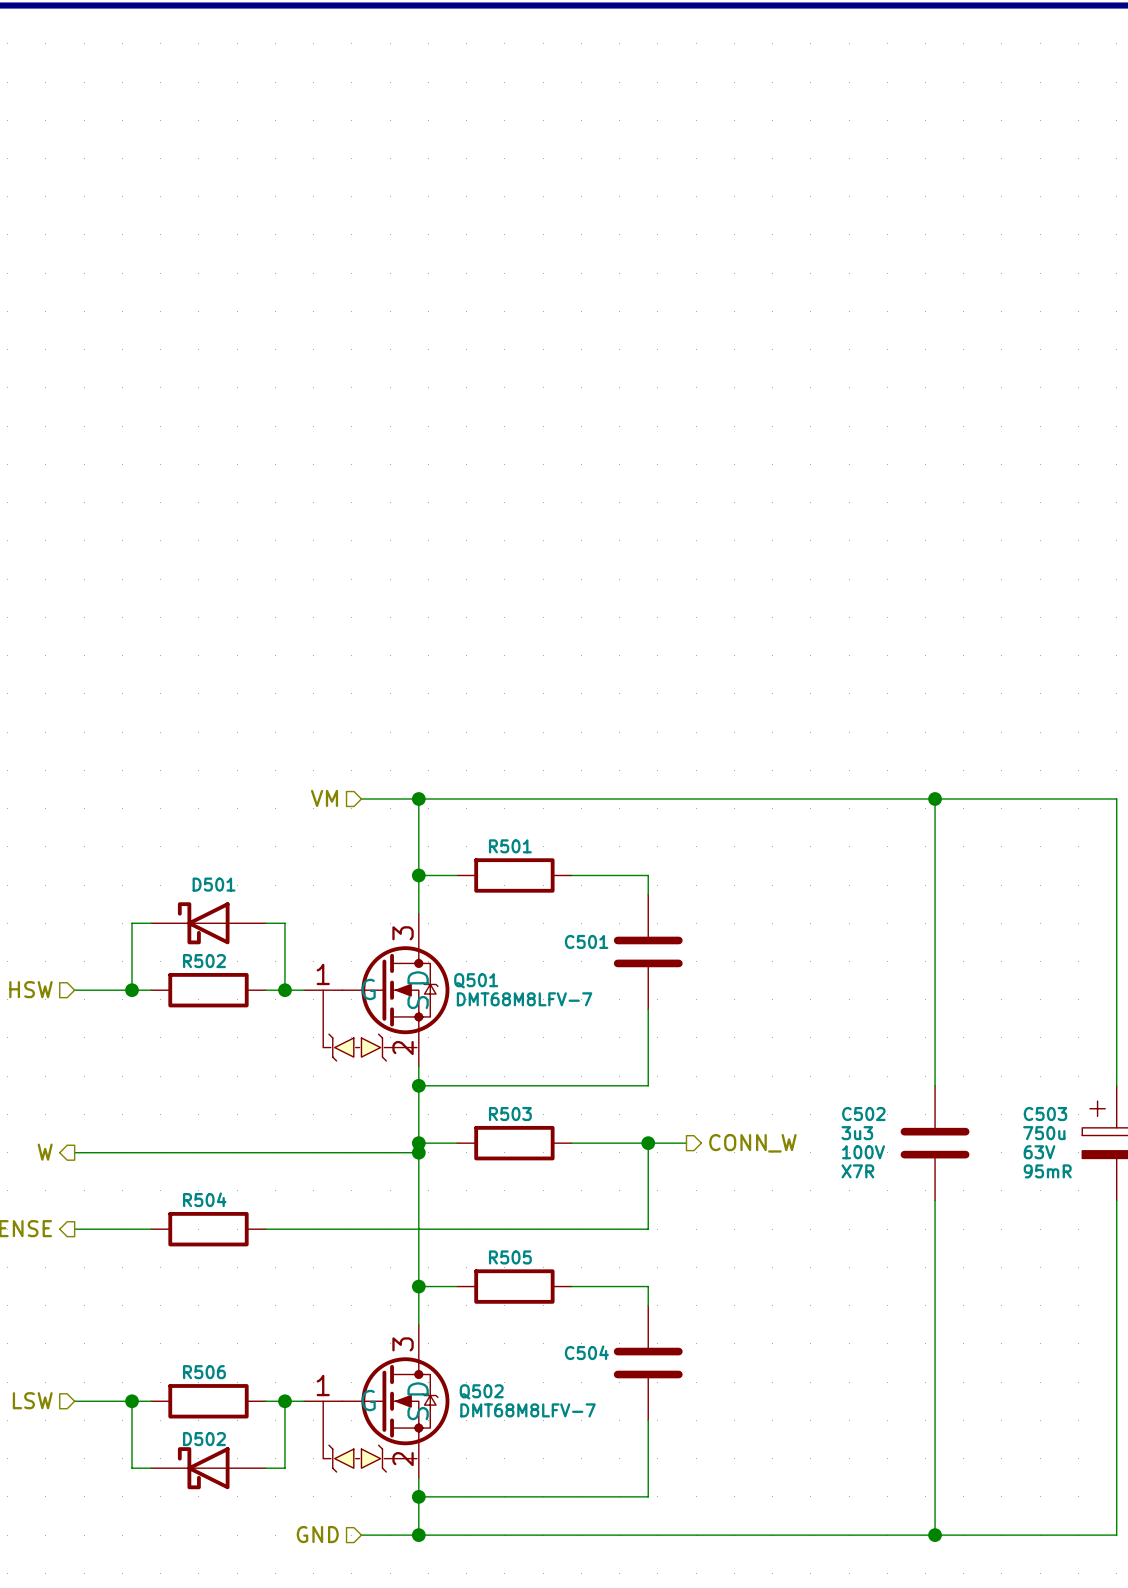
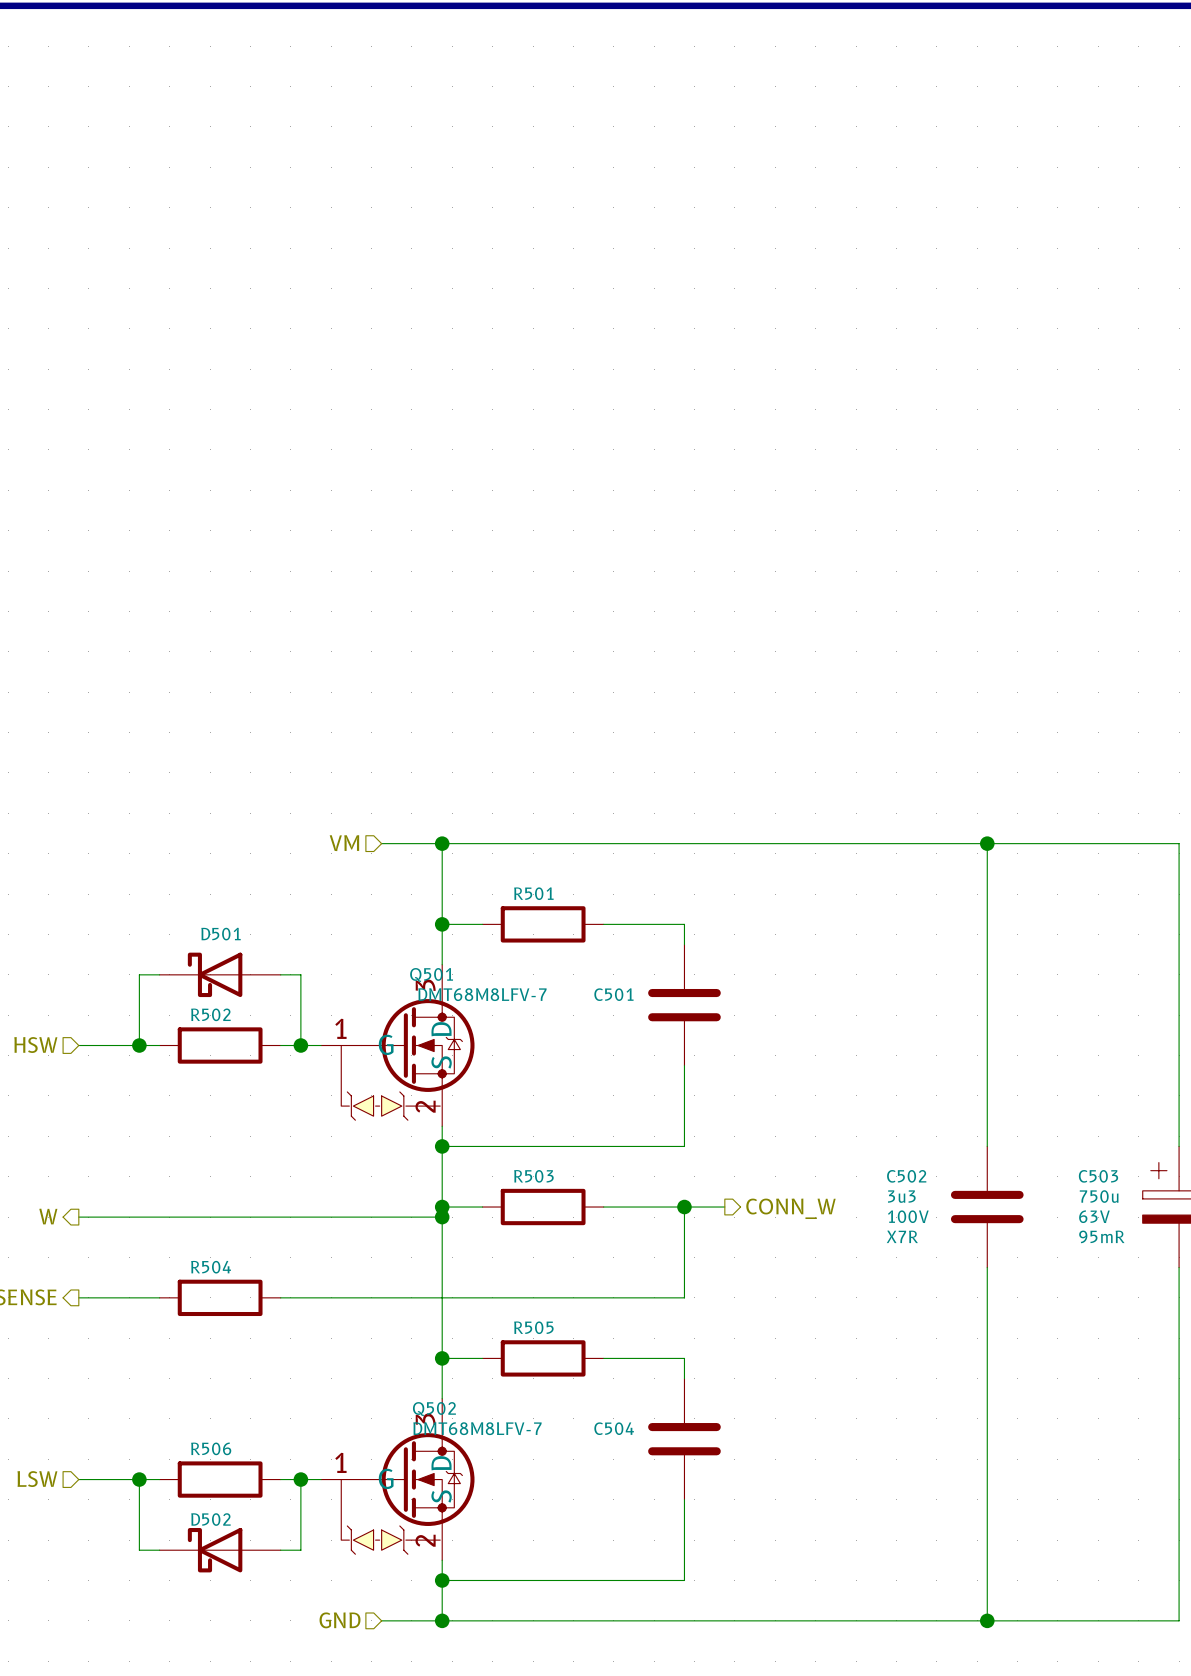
Q501 name position: Q501 (476, 980) -> Q501 (431, 974)
Q501 value position: DMT68M8LFV-7 (524, 999) -> DMT68M8LFV-7 (482, 994)
Q502 name position: Q502 (481, 1391) -> Q502 (434, 1409)
Q502 value position: DMT68M8LFV-7 (527, 1410) -> DMT68M8LFV-7 (477, 1428)

